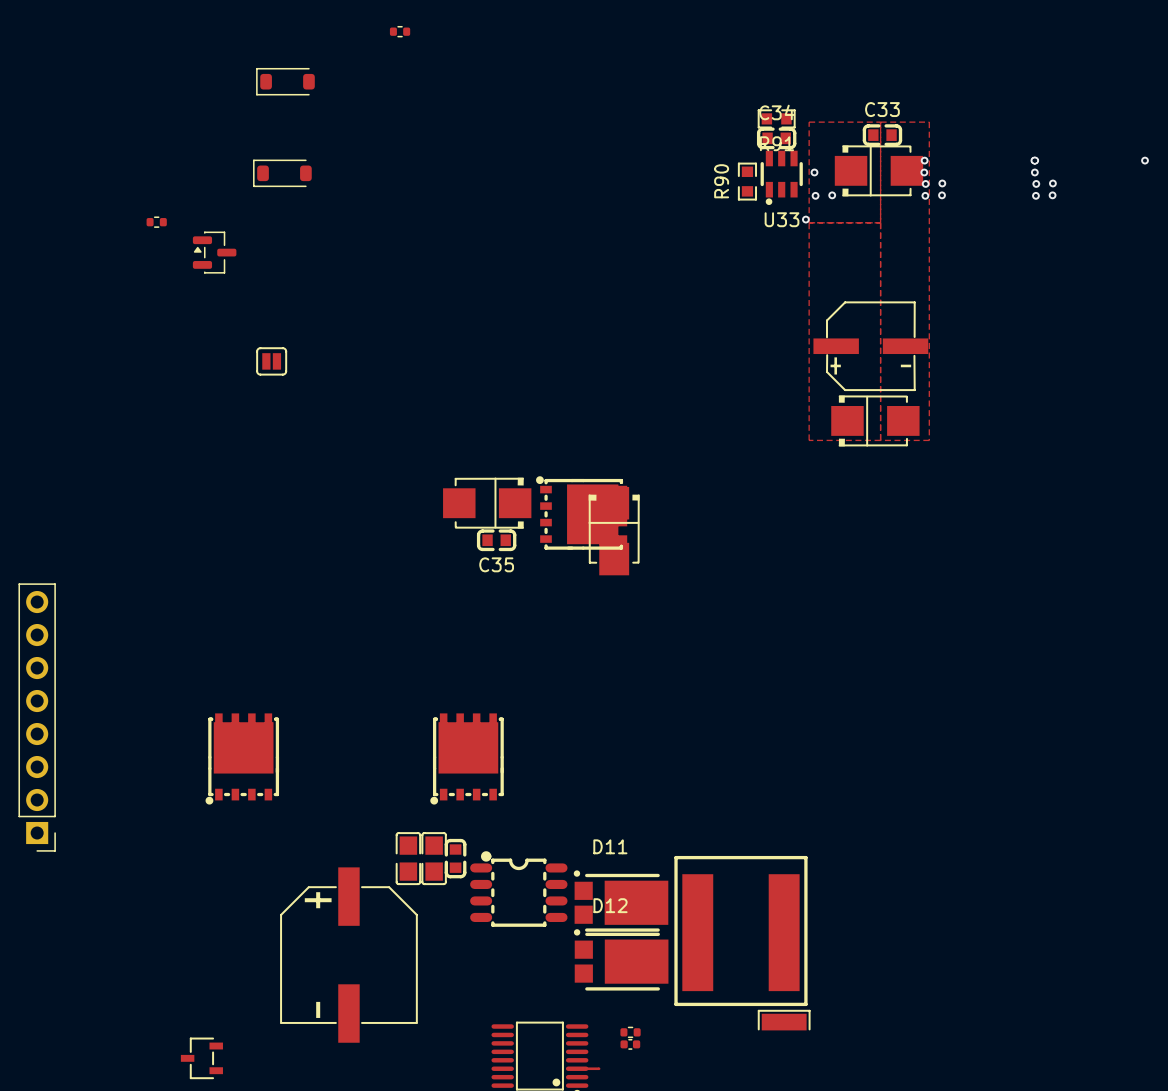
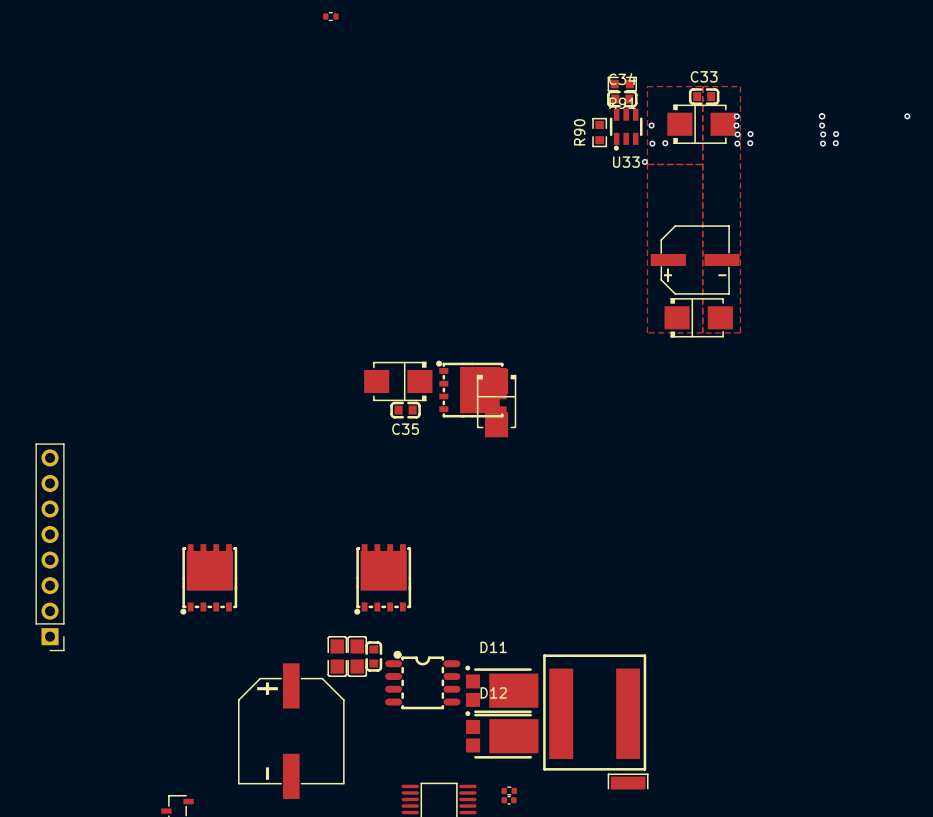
part: (285, 81) -> none
part: (282, 173) -> none
part: (156, 222) -> none
part: (214, 252) -> none
part: (271, 361) -> none

